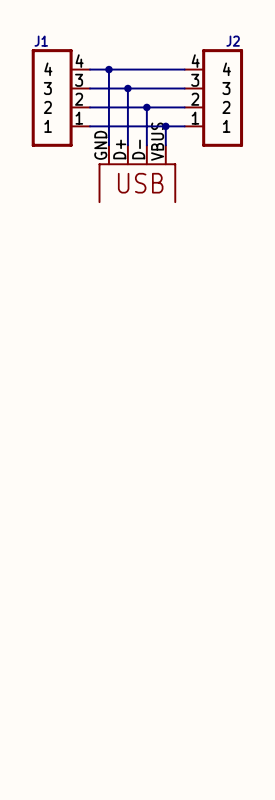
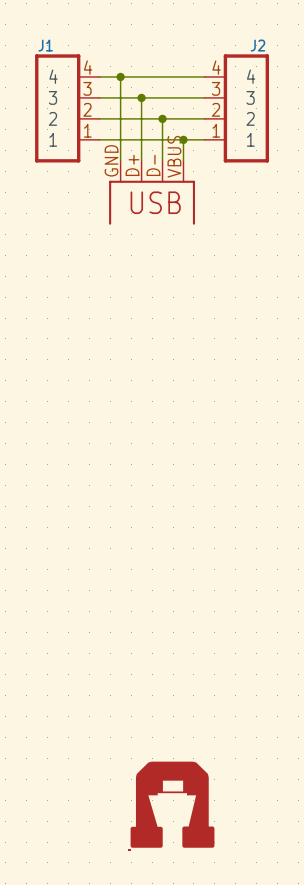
part: none -> (172, 804)

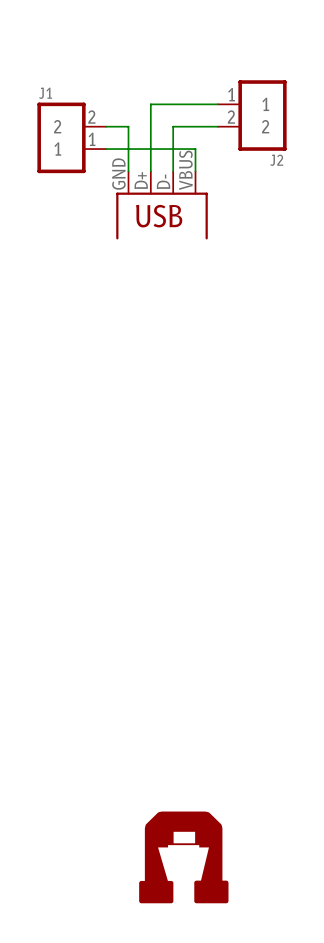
J1 name position: J1 (45, 45) -> J1 (45, 93)
J2 name position: J2 (257, 45) -> J2 (276, 160)
J1 symbol: [35, 54, 100, 163] -> [37, 102, 107, 174]
J2 symbol: [204, 54, 270, 163] -> [217, 80, 287, 151]
wire: (99, 76) (204, 76) -> none
wire: (120, 76) (120, 118) (162, 118) -> none
junction: (120, 76) -> none
wire: (99, 97) (141, 97) -> none
junction: (141, 97) -> none
junction: (162, 118) -> none
wire: (183, 139) (204, 139) -> none
junction: (183, 139) -> none

